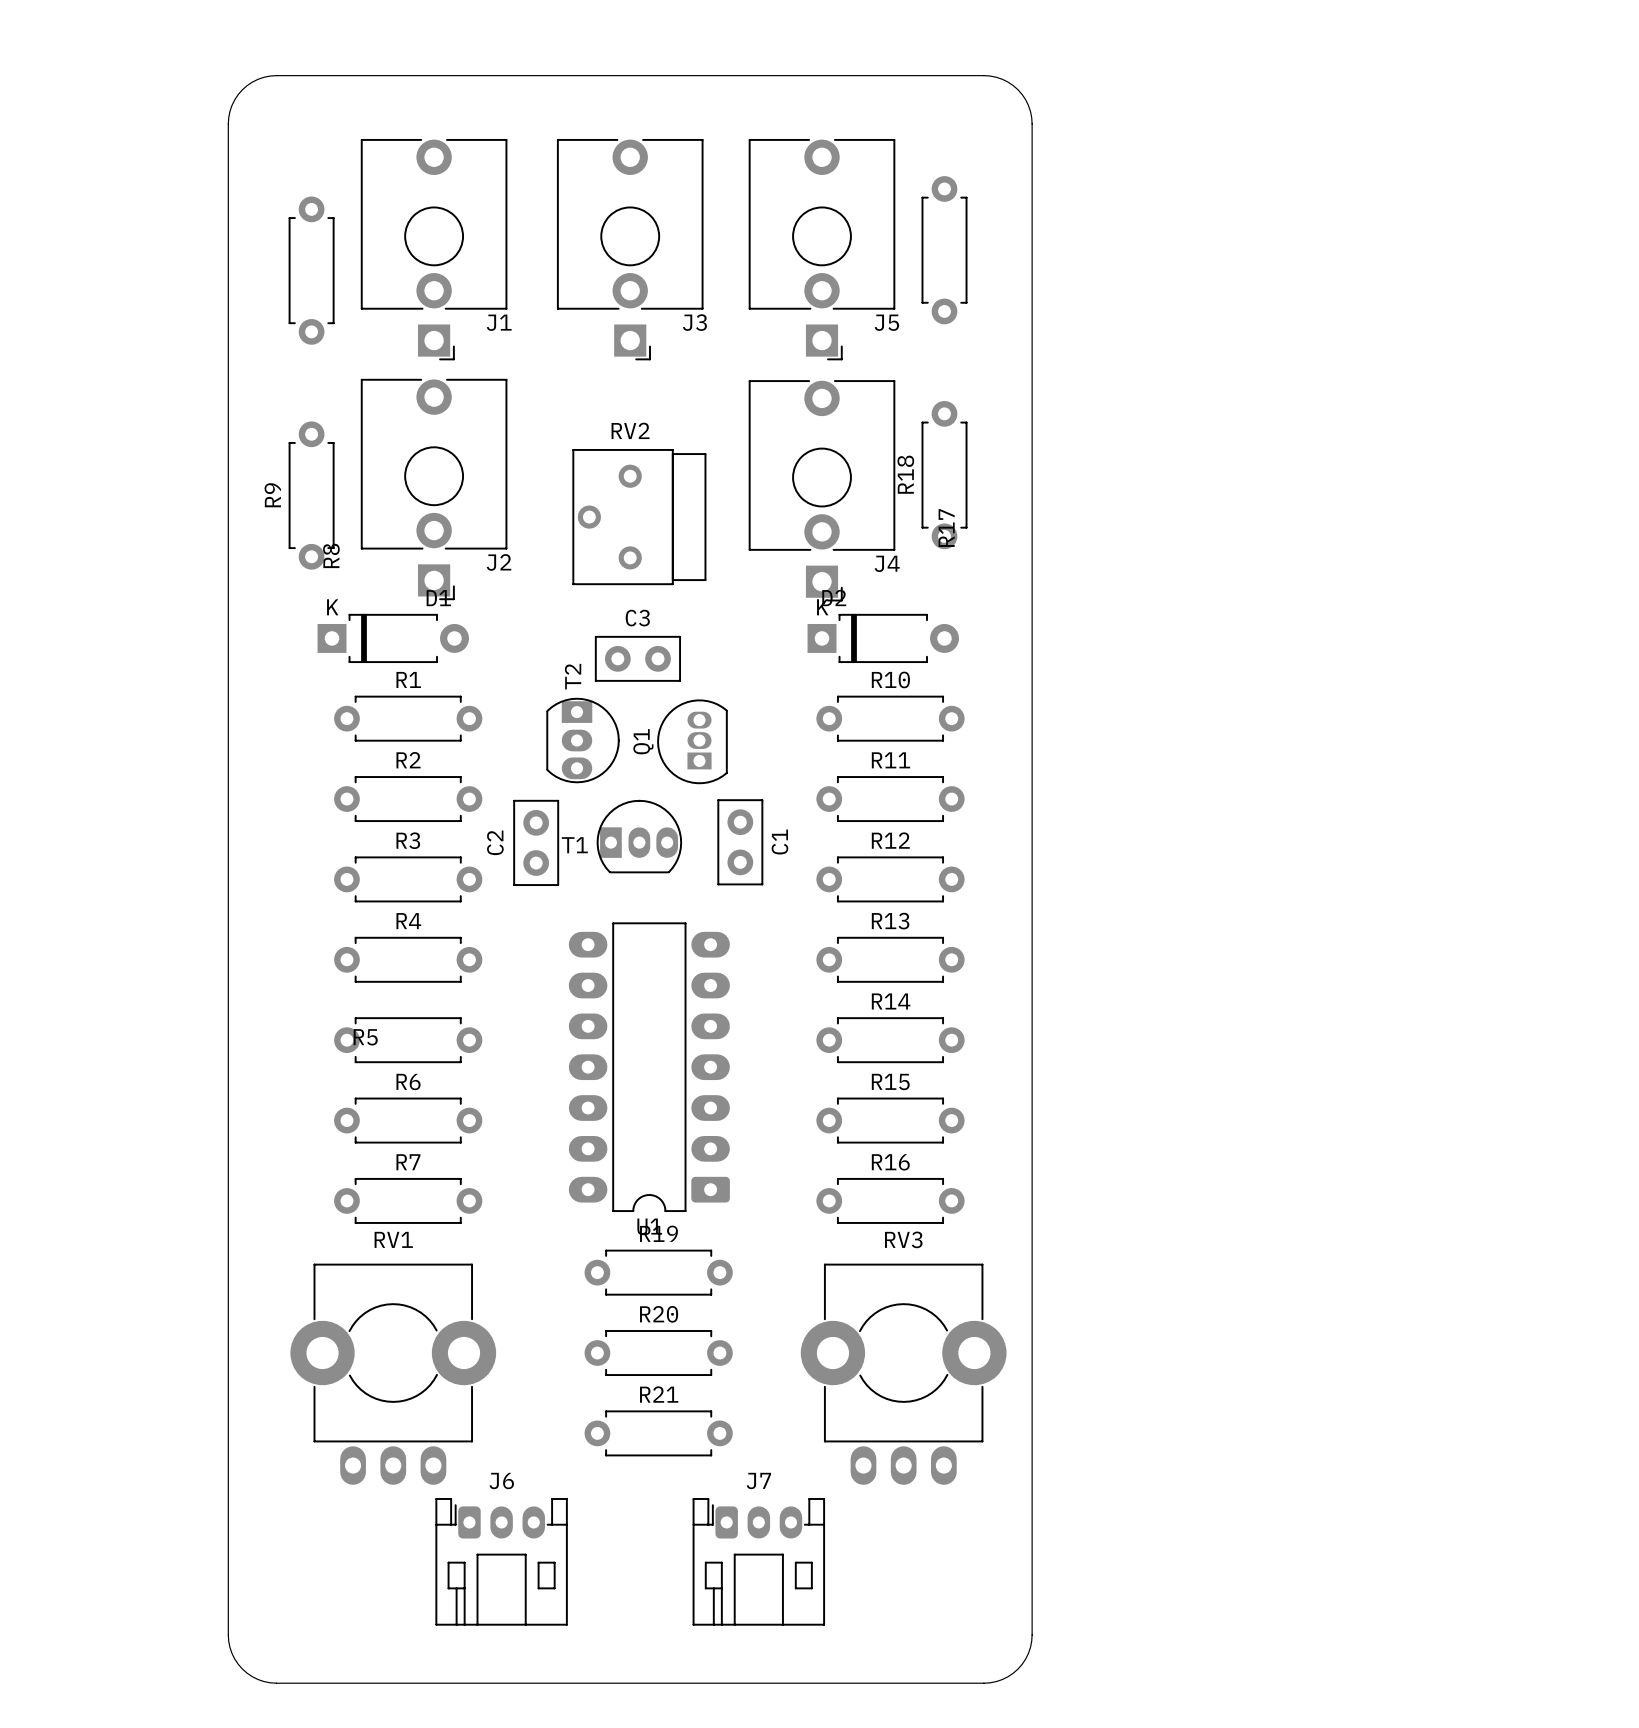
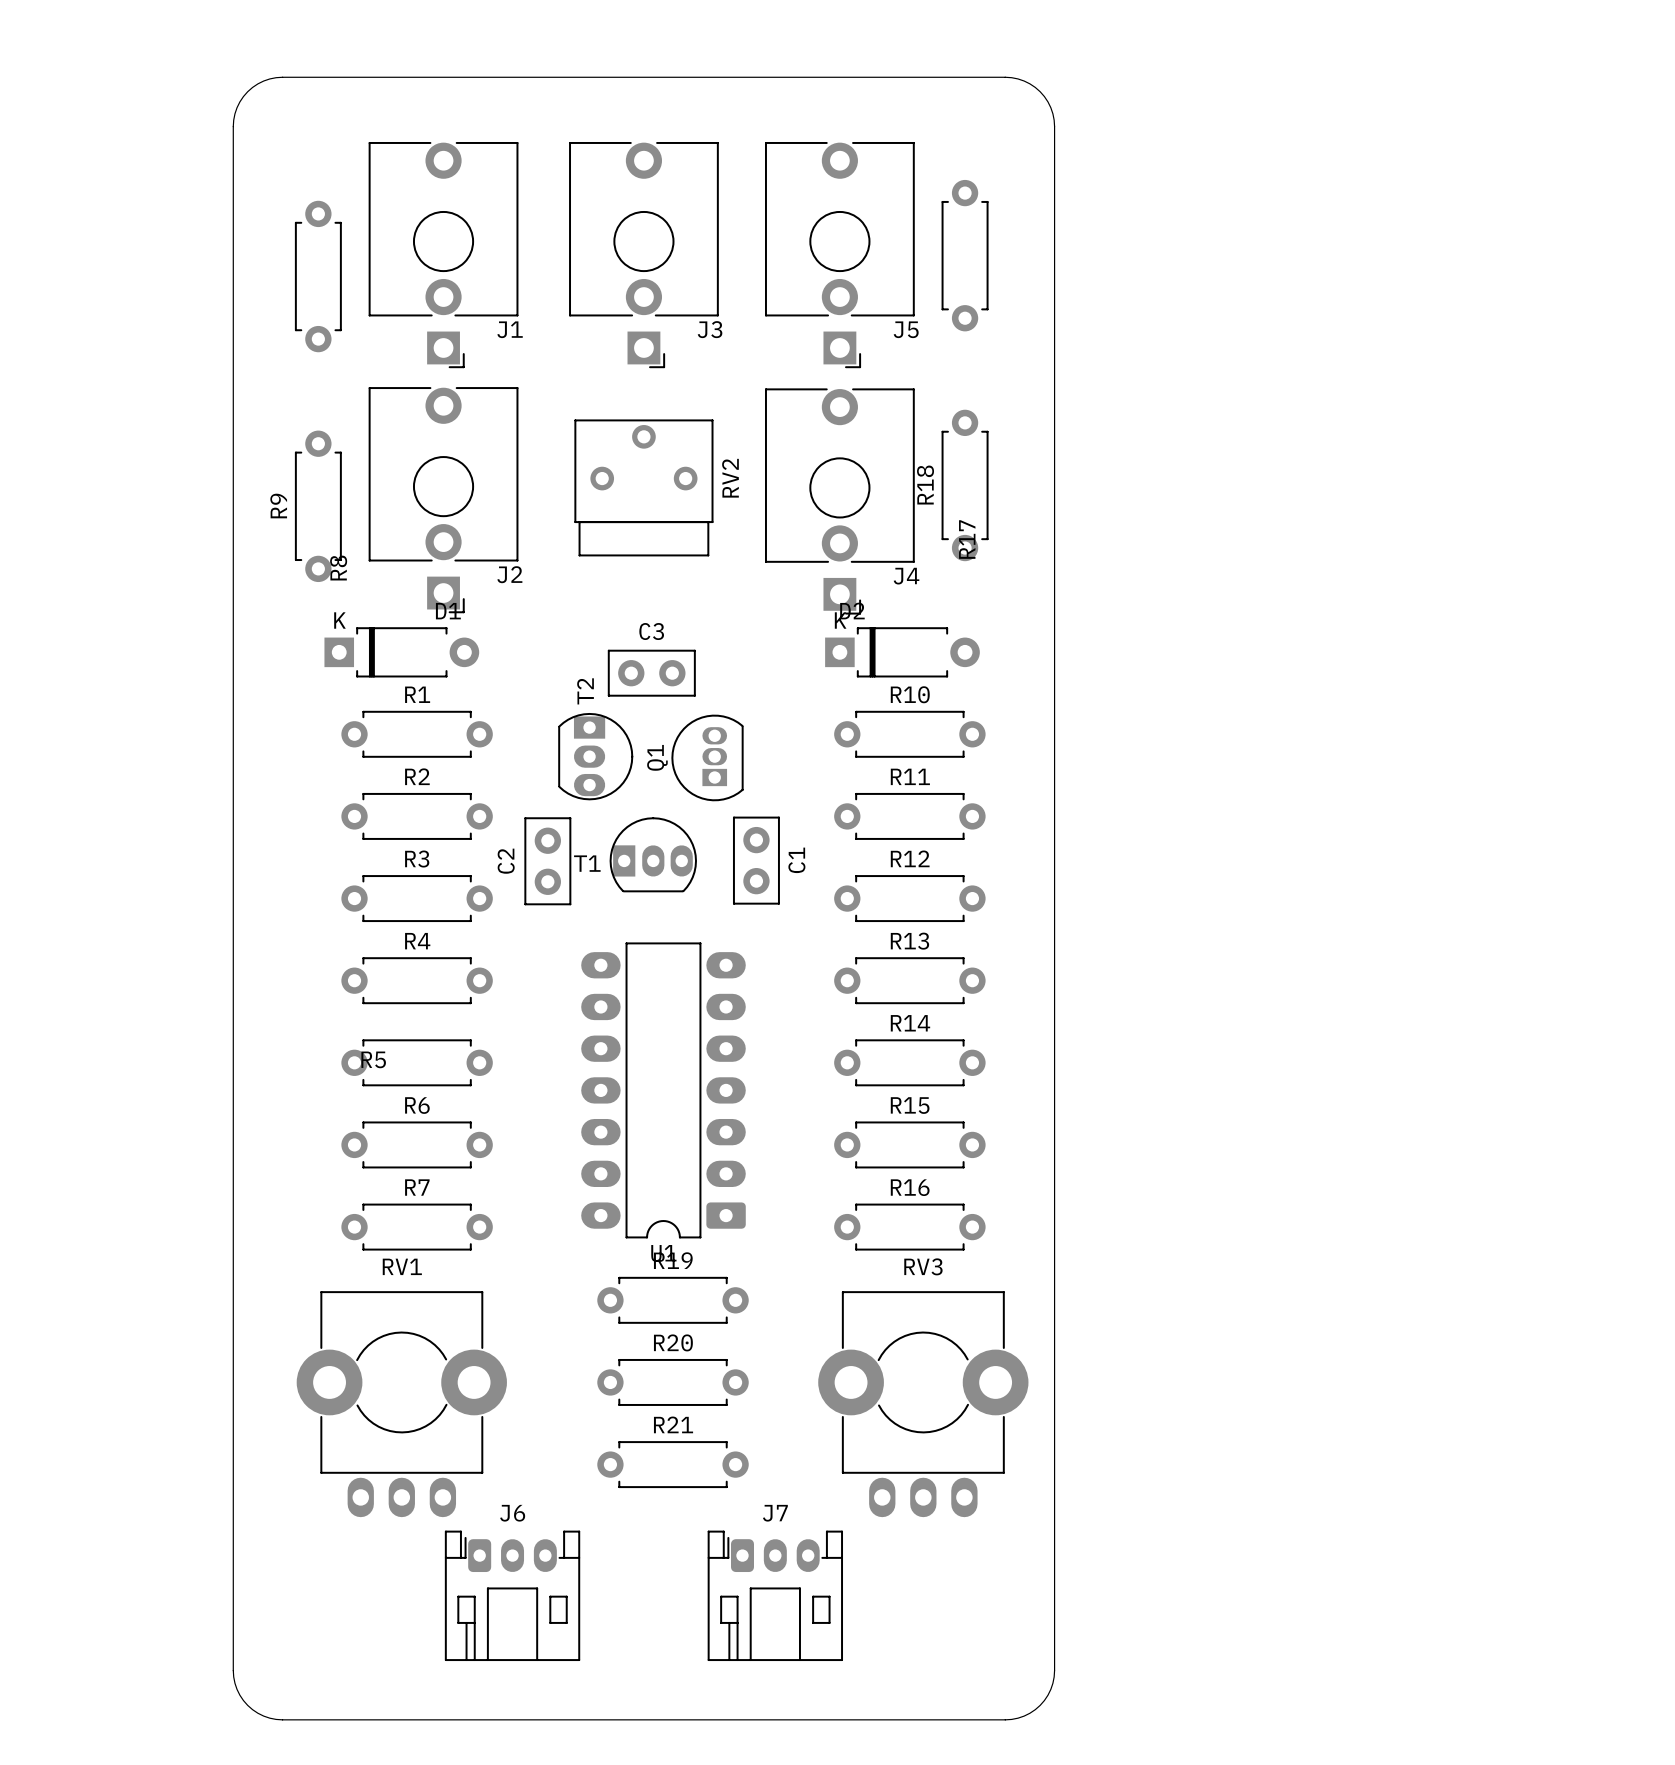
RV2 rotation: 0° (639, 517) -> 90° clockwise (643, 487)

